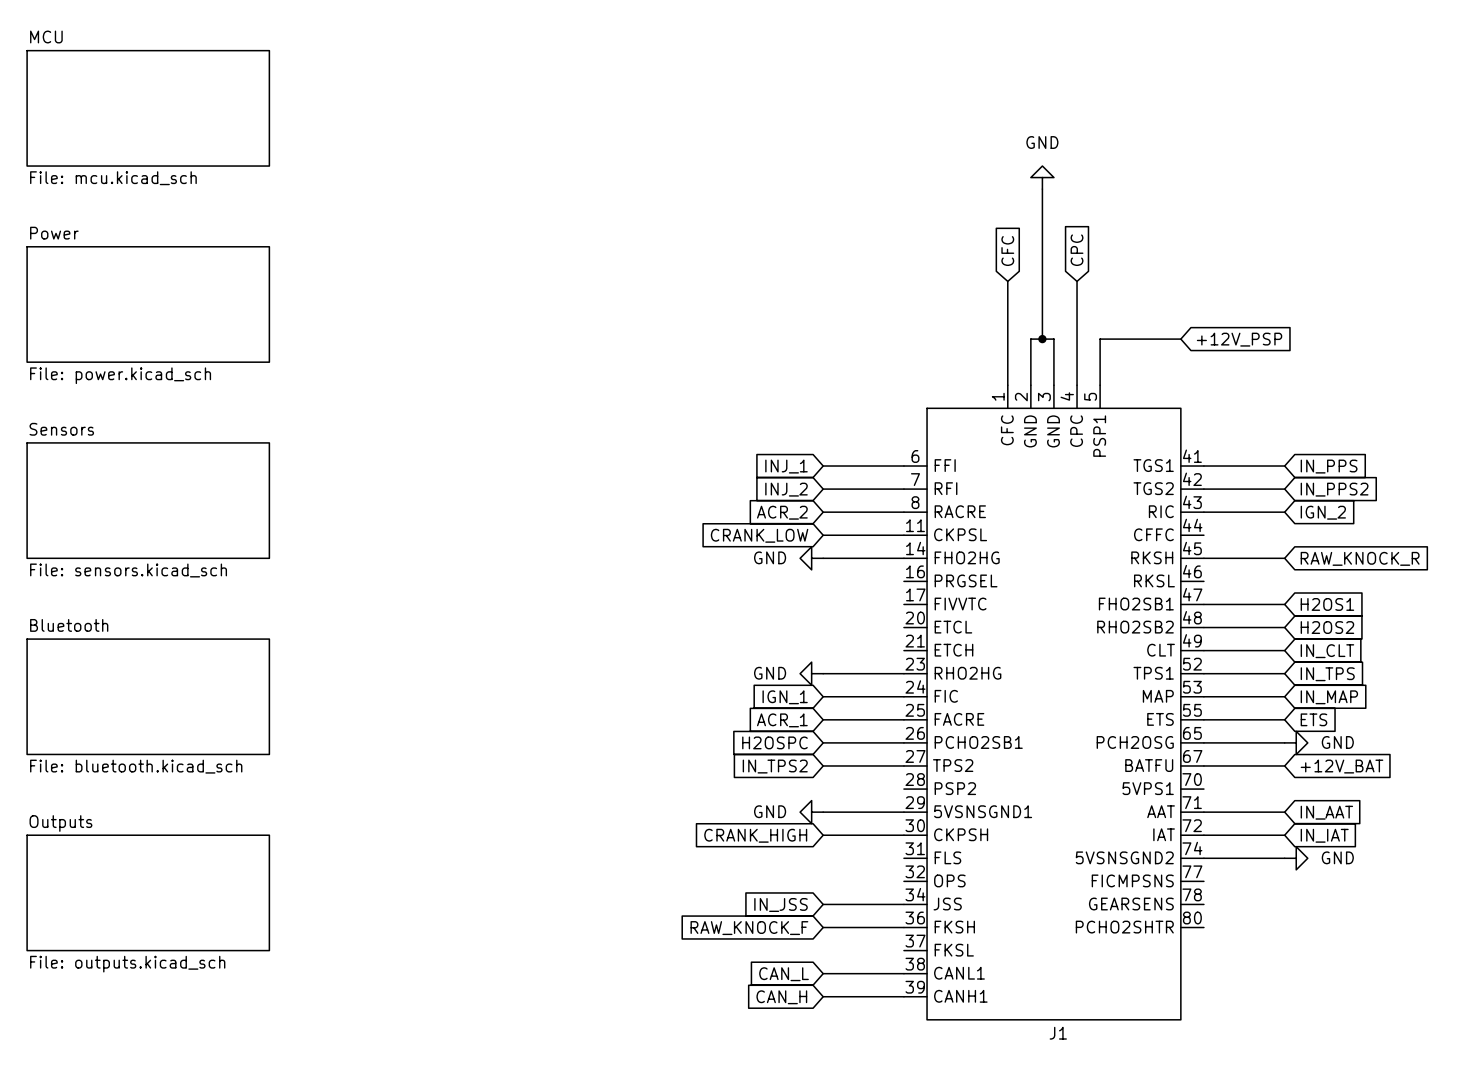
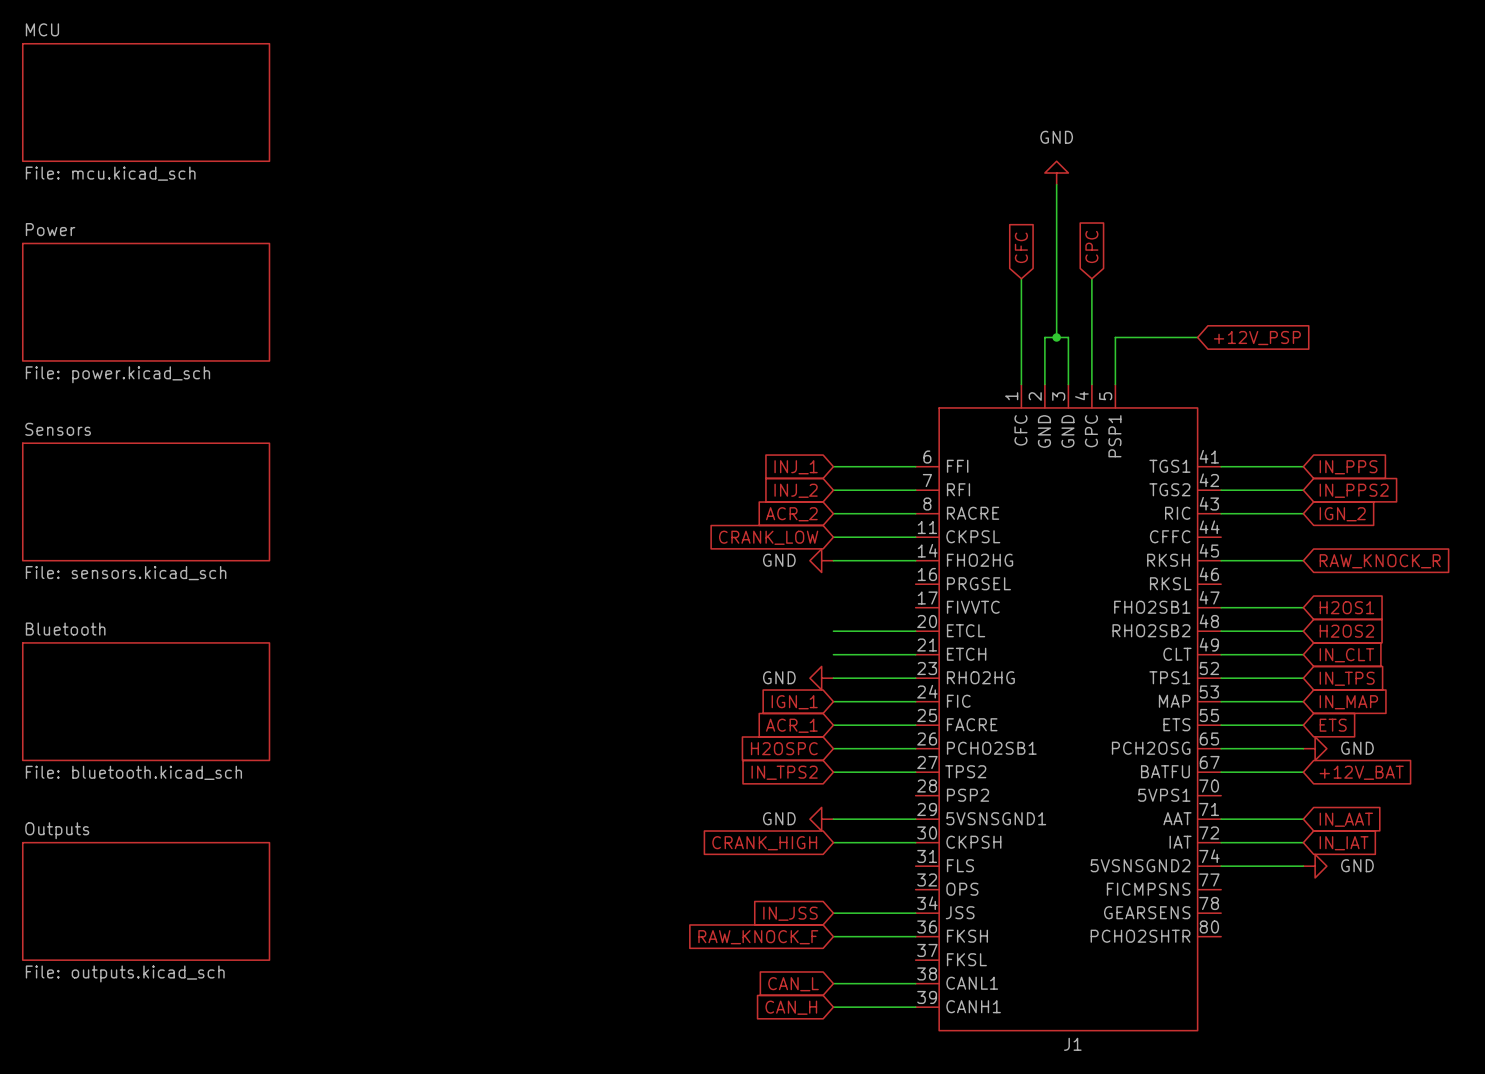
wire: none -> (833, 631) (915, 631)
wire: none -> (833, 654) (915, 654)

